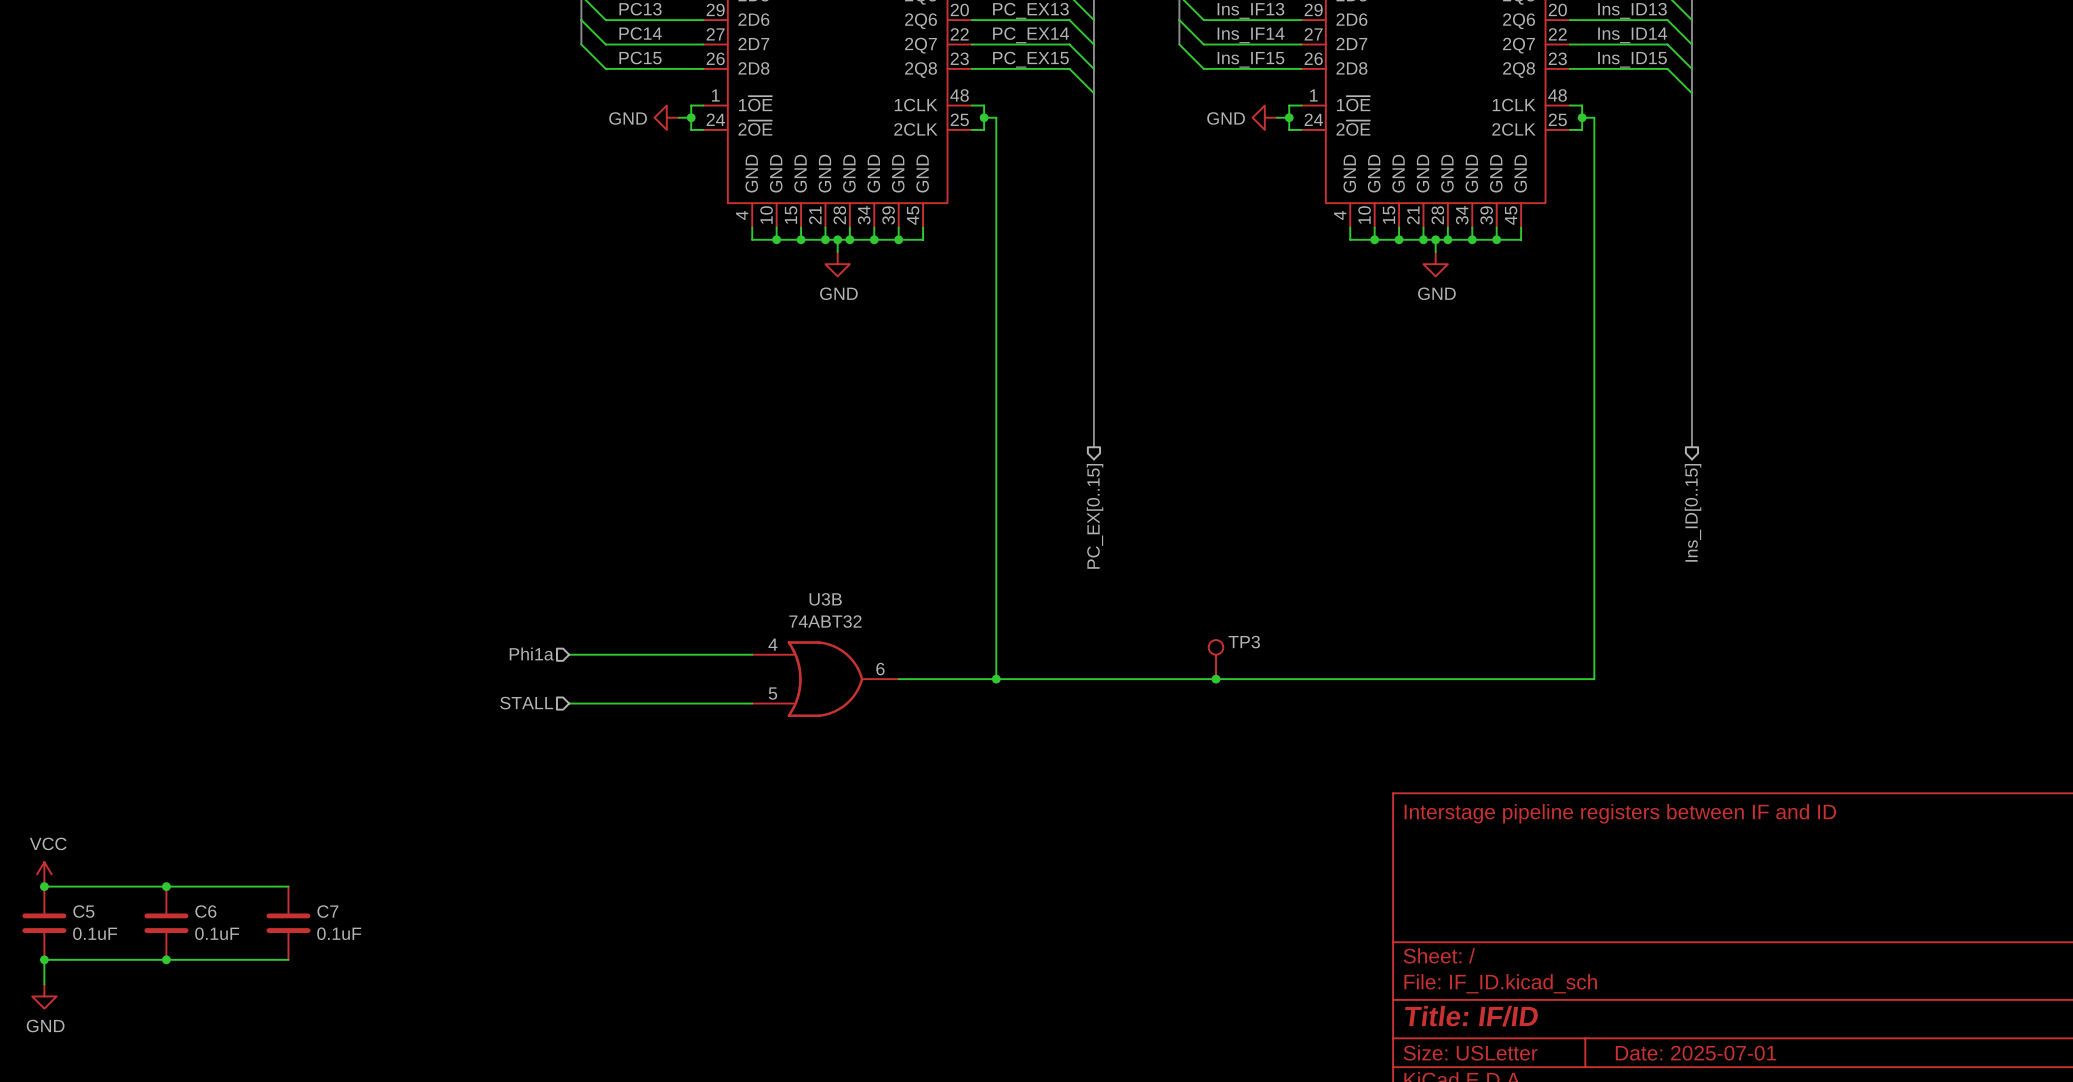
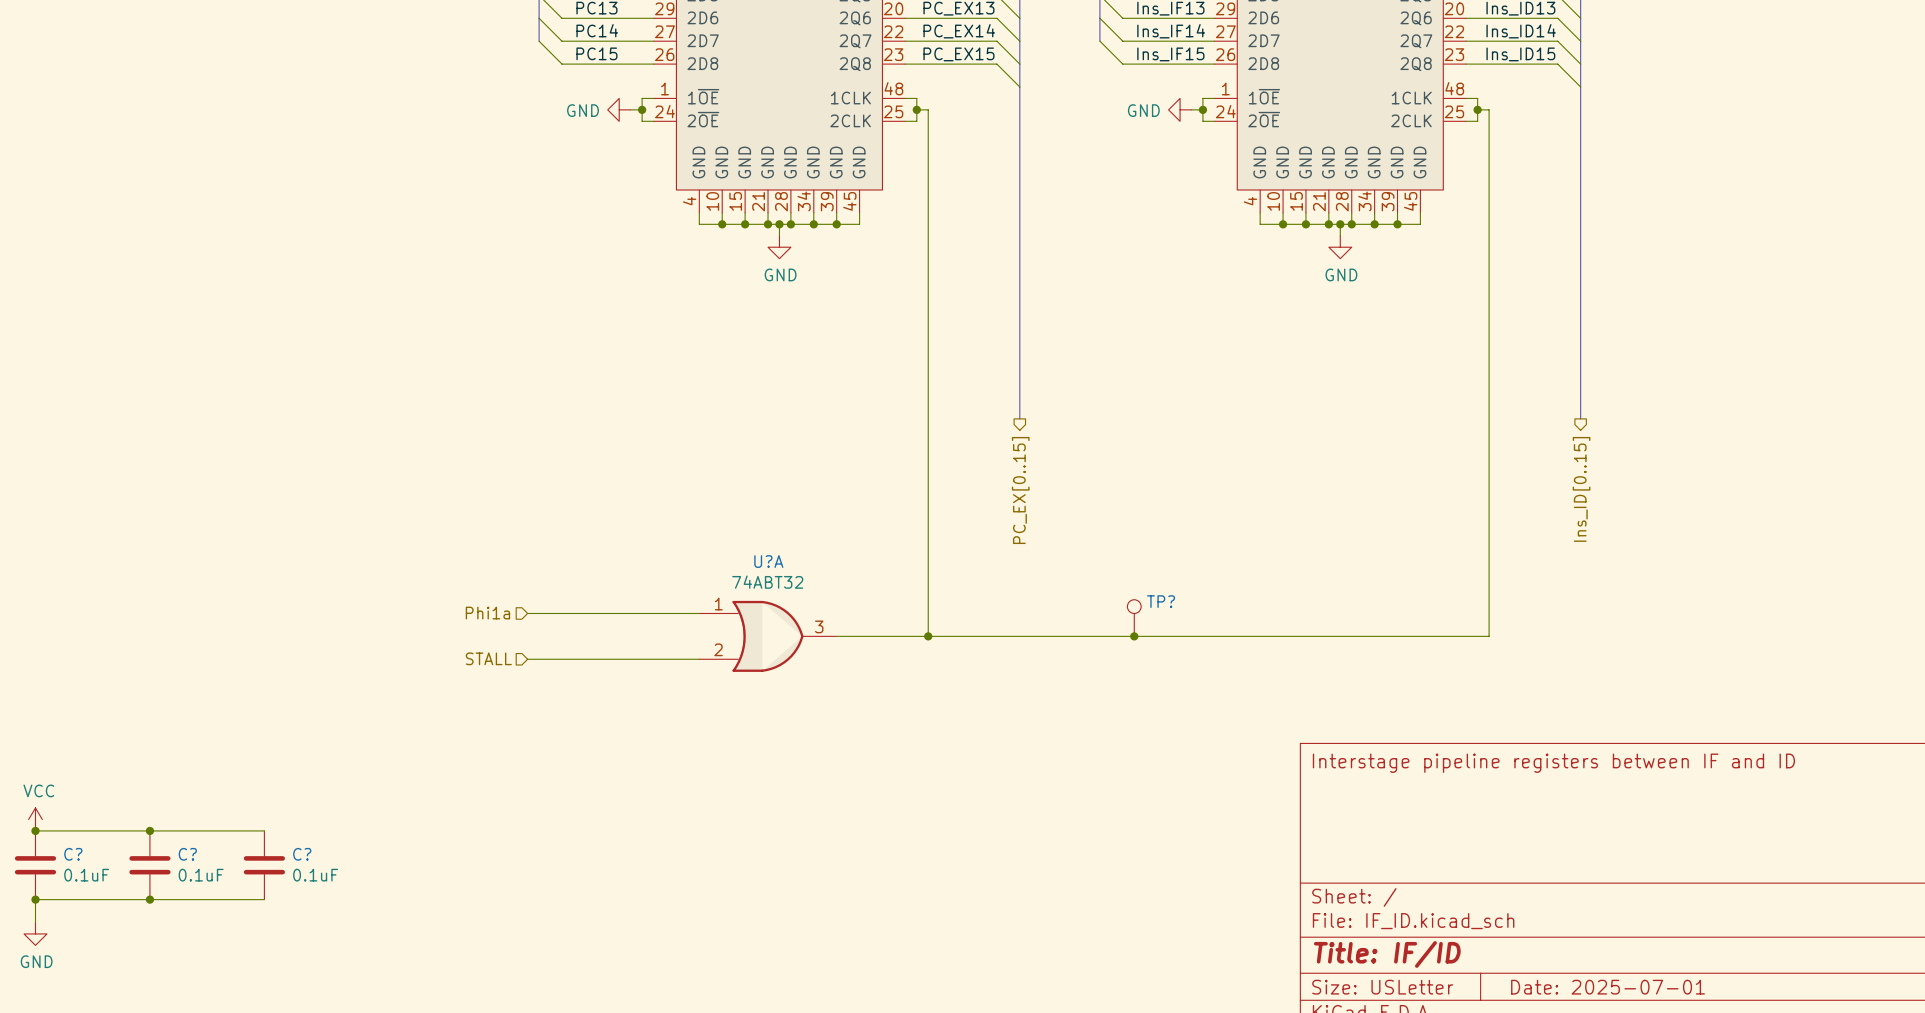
U3B name: U3B (825, 599) -> U?A (768, 561)
TP3 name: TP3 (1244, 642) -> TP? (1161, 601)
U3B pin number: 4 (772, 644) -> 1 (718, 604)
U3B pin number: 6 (880, 669) -> 3 (819, 626)
U3B pin number: 5 (772, 693) -> 2 (718, 649)
C5 name: C5 (83, 911) -> C? (73, 854)
C6 name: C6 (205, 911) -> C? (187, 854)
C7 name: C7 (327, 911) -> C? (302, 854)

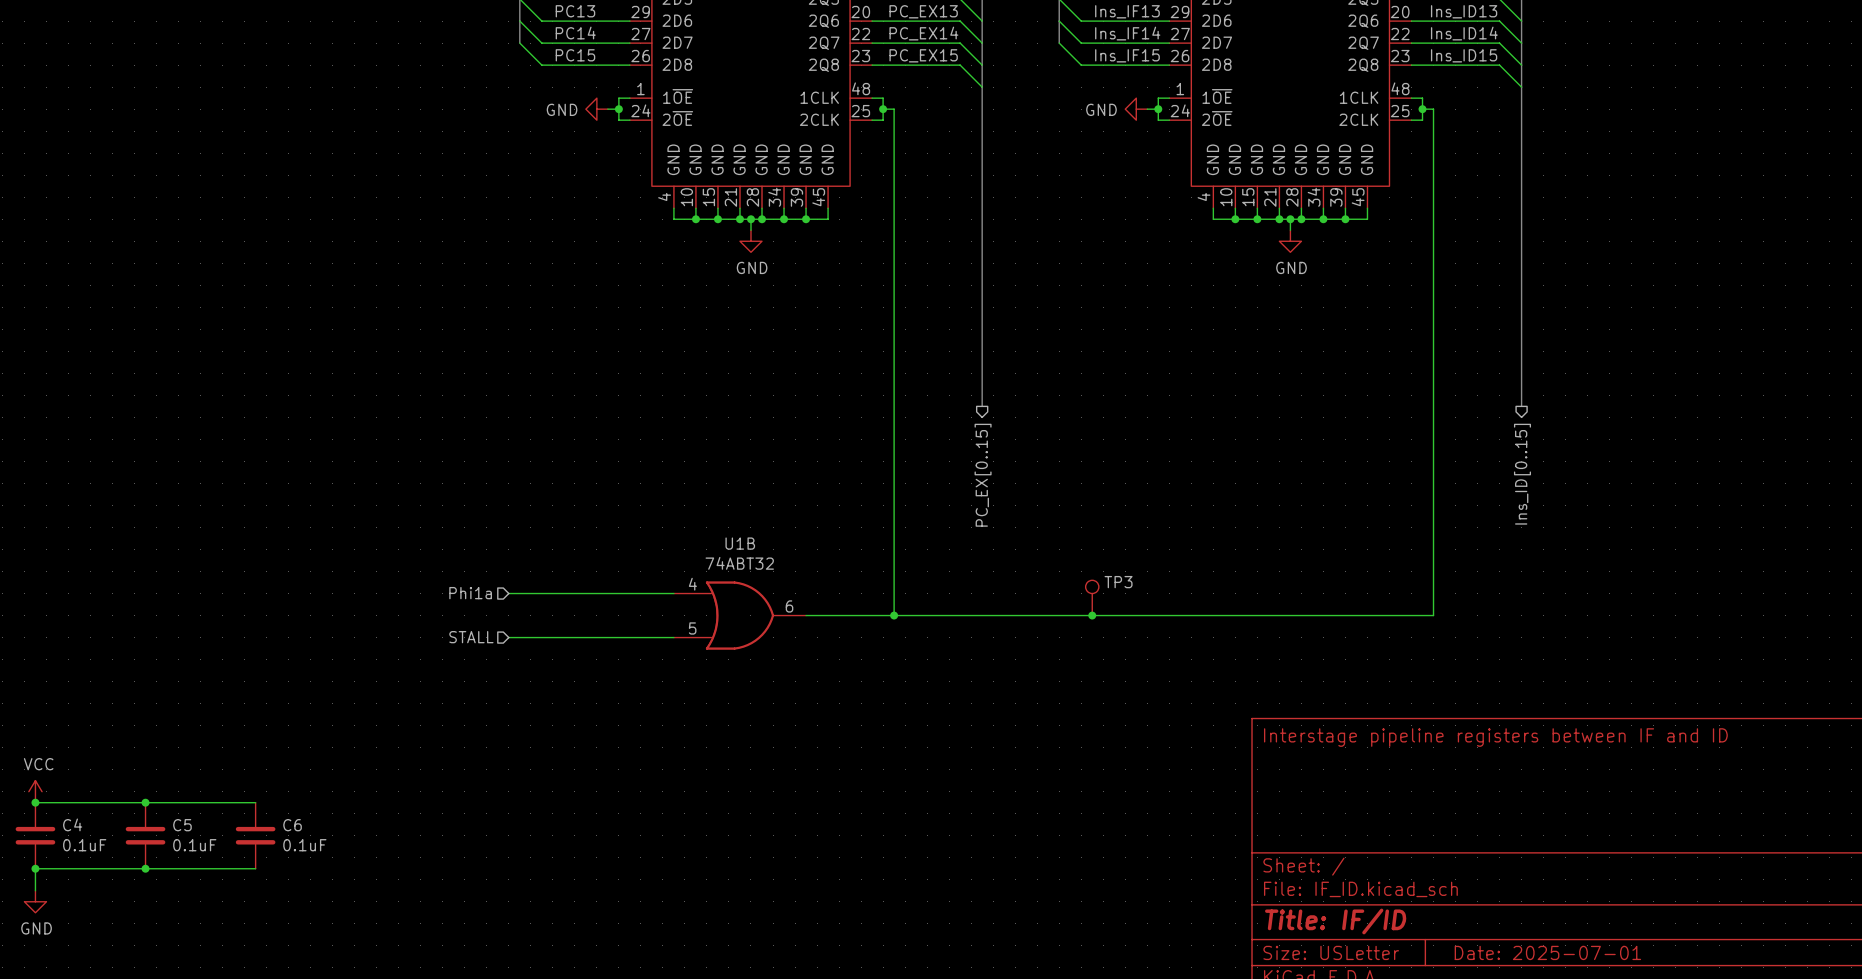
U?A name: U?A (768, 561) -> U1B (740, 543)
TP? name: TP? (1161, 601) -> TP3 (1118, 582)
U?A pin number: 1 (718, 604) -> 4 (692, 584)
U?A pin number: 3 (819, 626) -> 6 (789, 606)
U?A pin number: 2 (718, 649) -> 5 (692, 628)
C? name: C? (73, 854) -> C4 (72, 824)
C? name: C? (187, 854) -> C5 (182, 825)
C? name: C? (302, 854) -> C6 (292, 825)

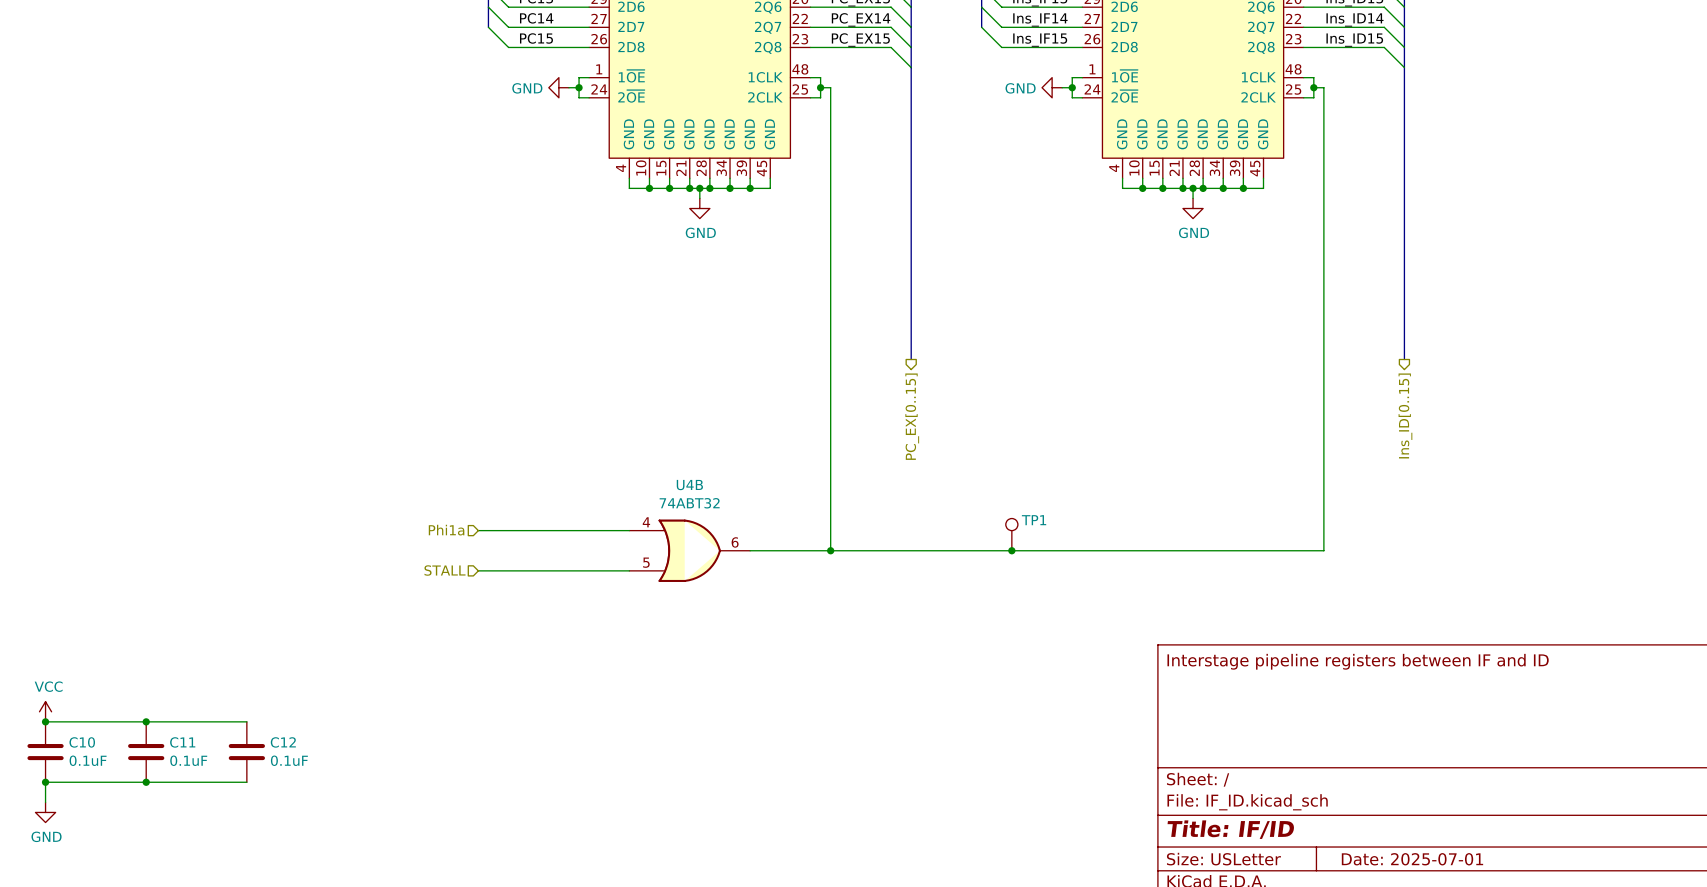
U1B name: U1B (740, 543) -> U4B (689, 485)
TP3 name: TP3 (1118, 582) -> TP1 (1034, 520)
C4 name: C4 (72, 824) -> C10 (82, 742)
C5 name: C5 (182, 825) -> C11 (182, 742)
C6 name: C6 (292, 825) -> C12 (283, 742)

